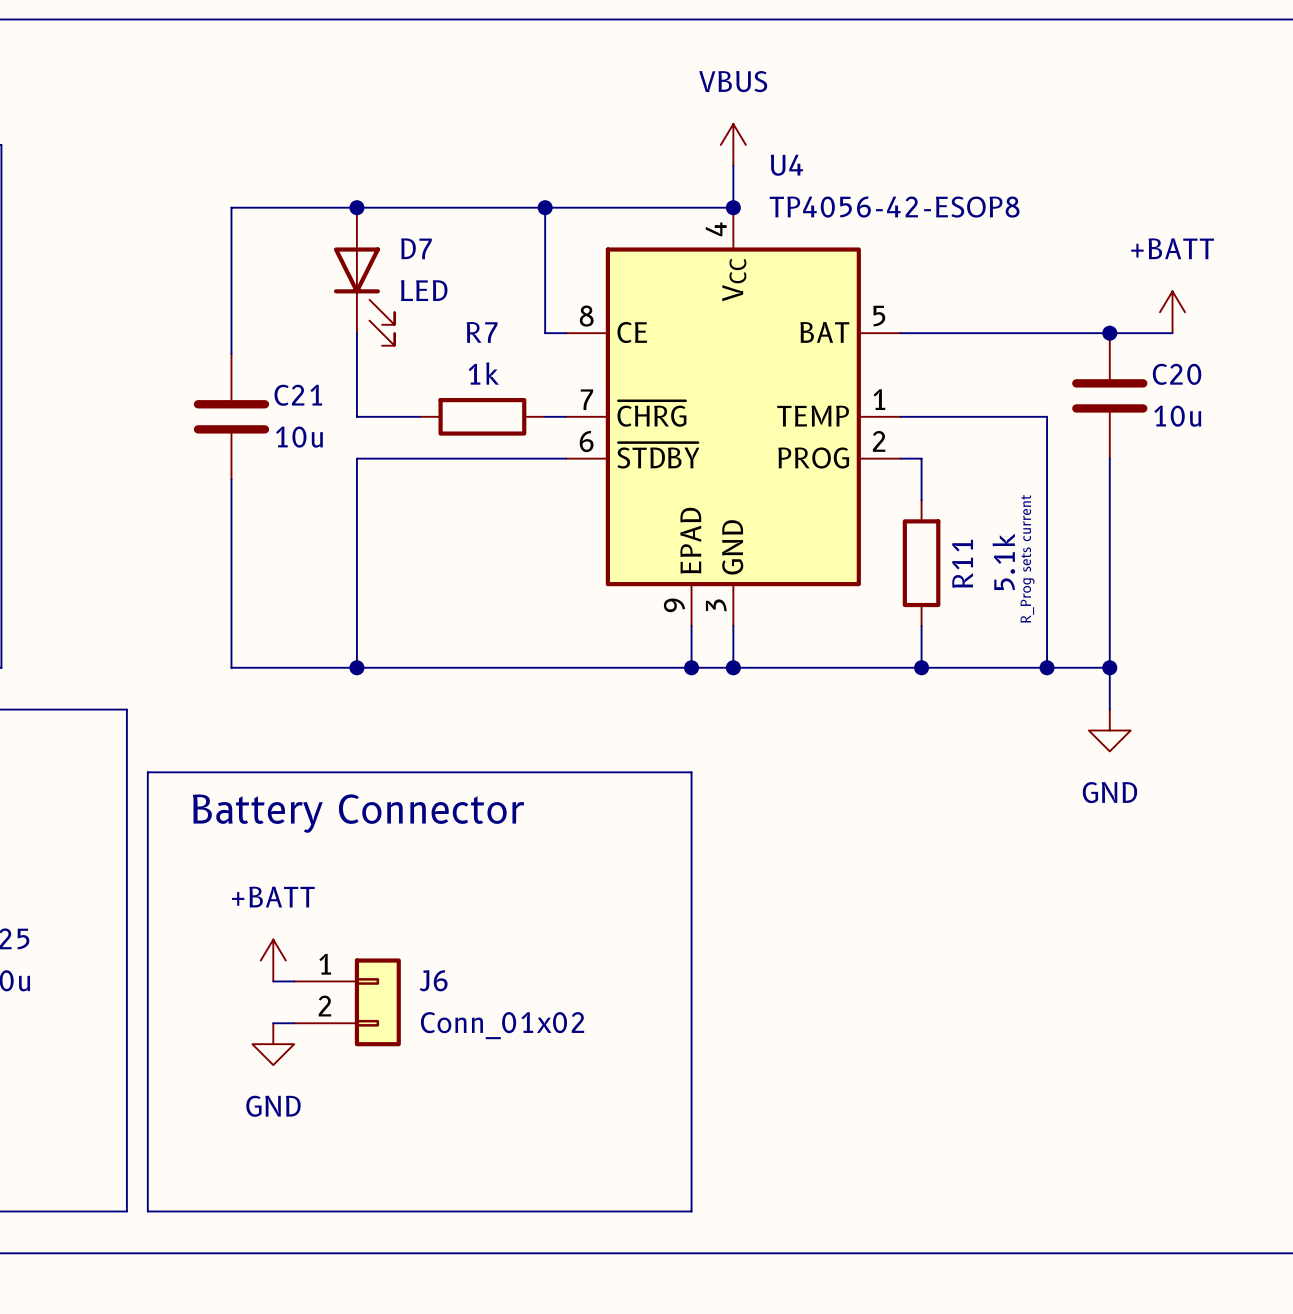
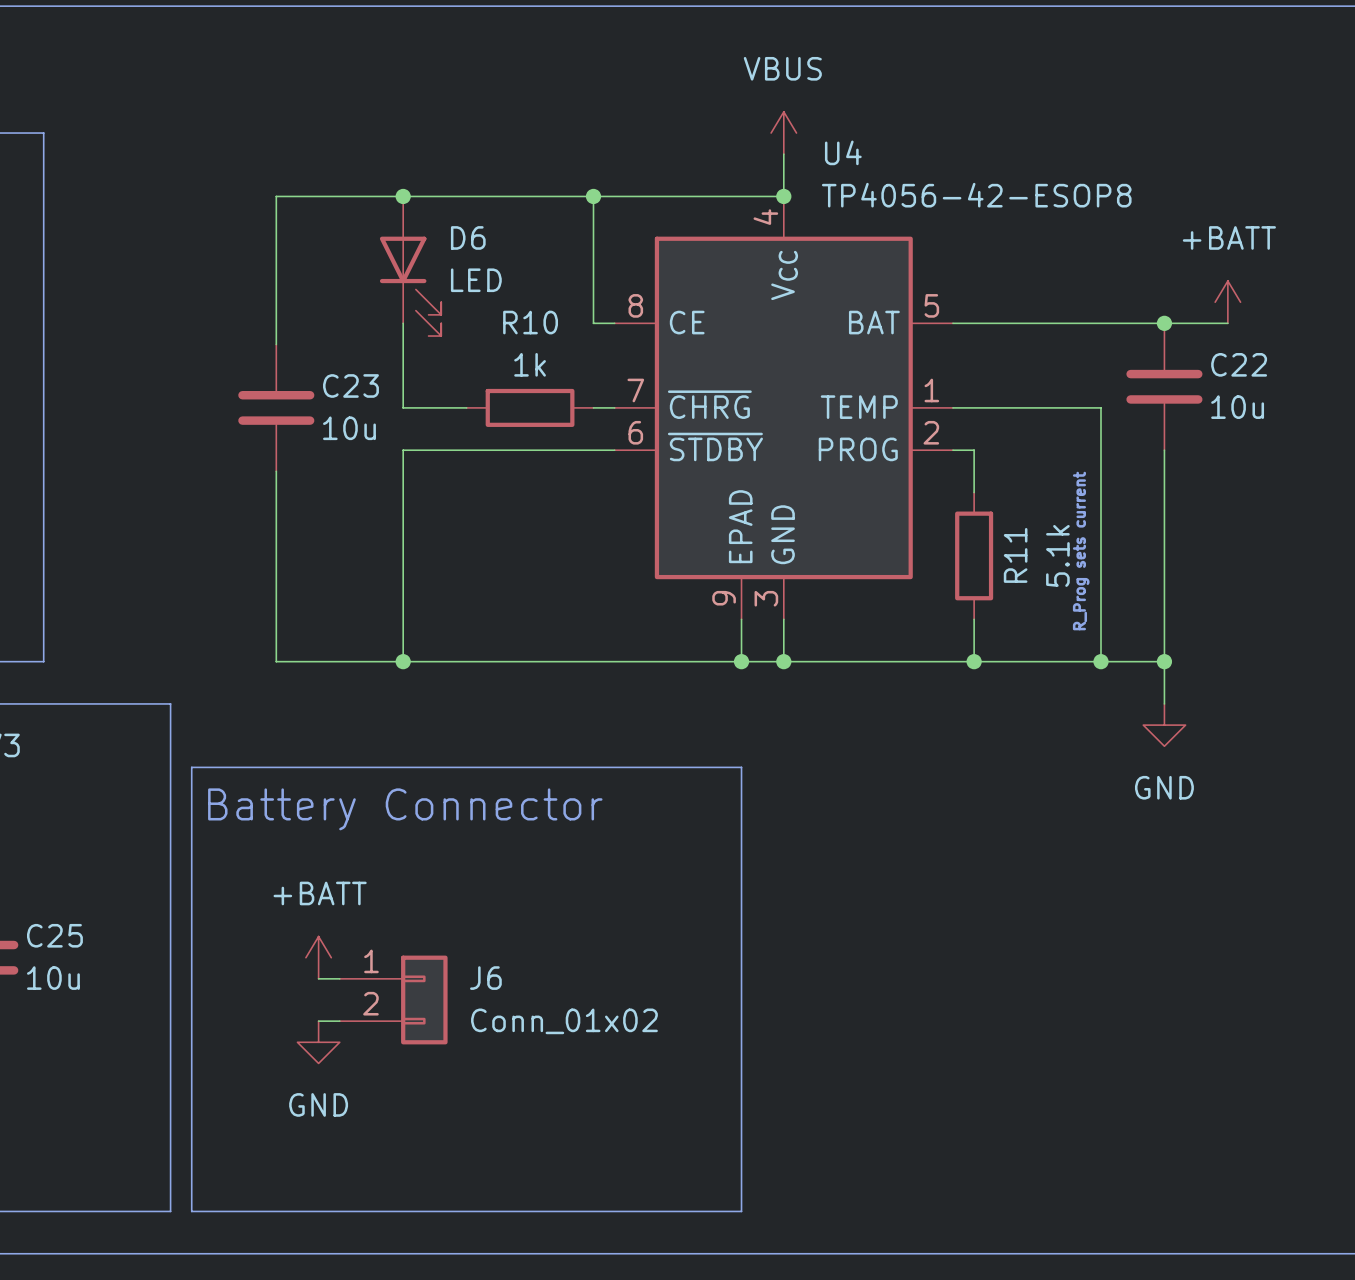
D7 name: D7 (416, 248) -> D6 (468, 237)
R7 name: R7 (482, 332) -> R10 (530, 322)
C20 name: C20 (1177, 374) -> C22 (1239, 364)
C21 name: C21 (298, 395) -> C23 (350, 385)

